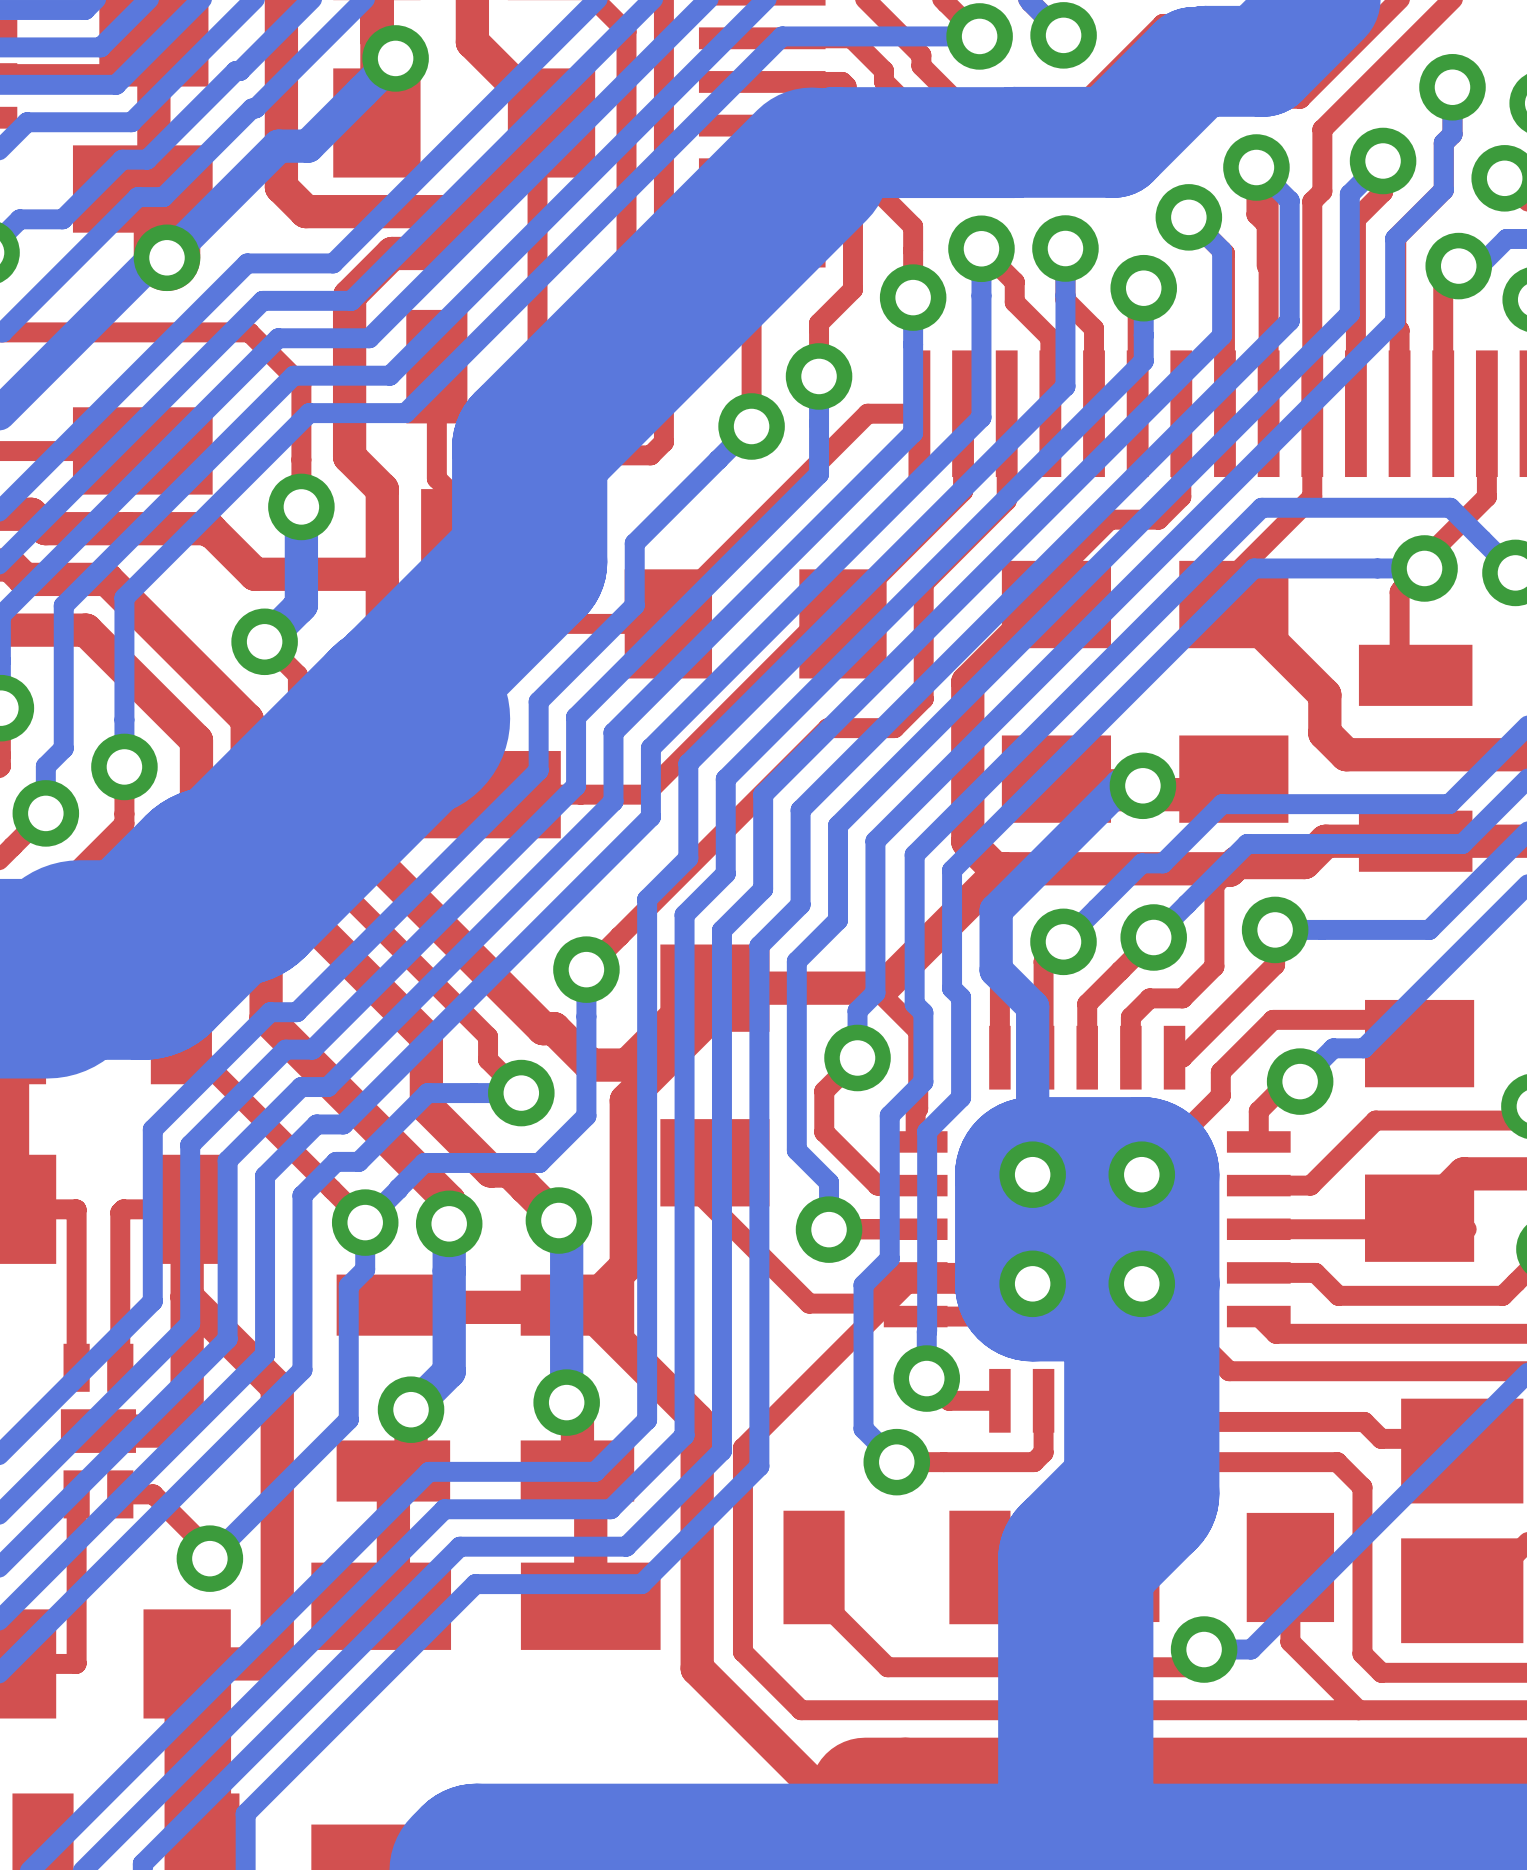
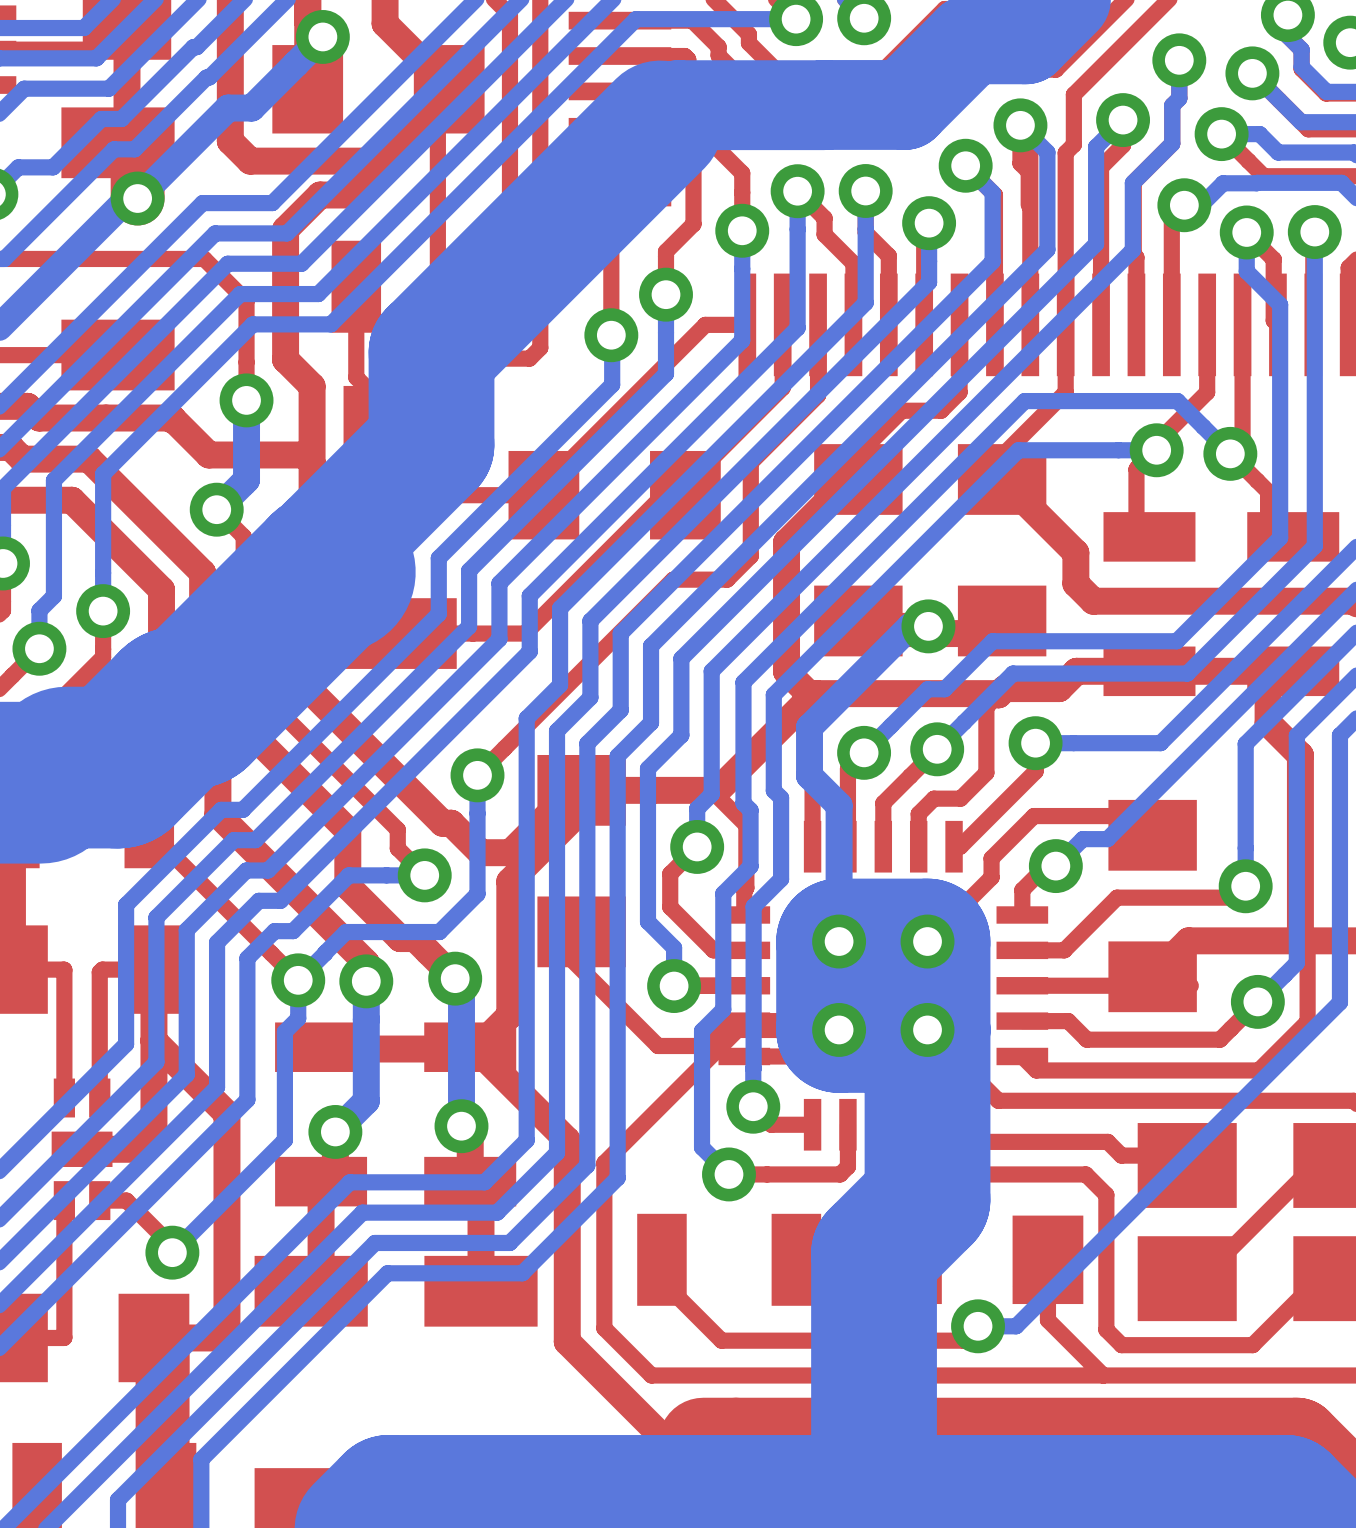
bottom track: (751, 426) (634, 543) (634, 605) -> (612, 336) (612, 384) (516, 480)

